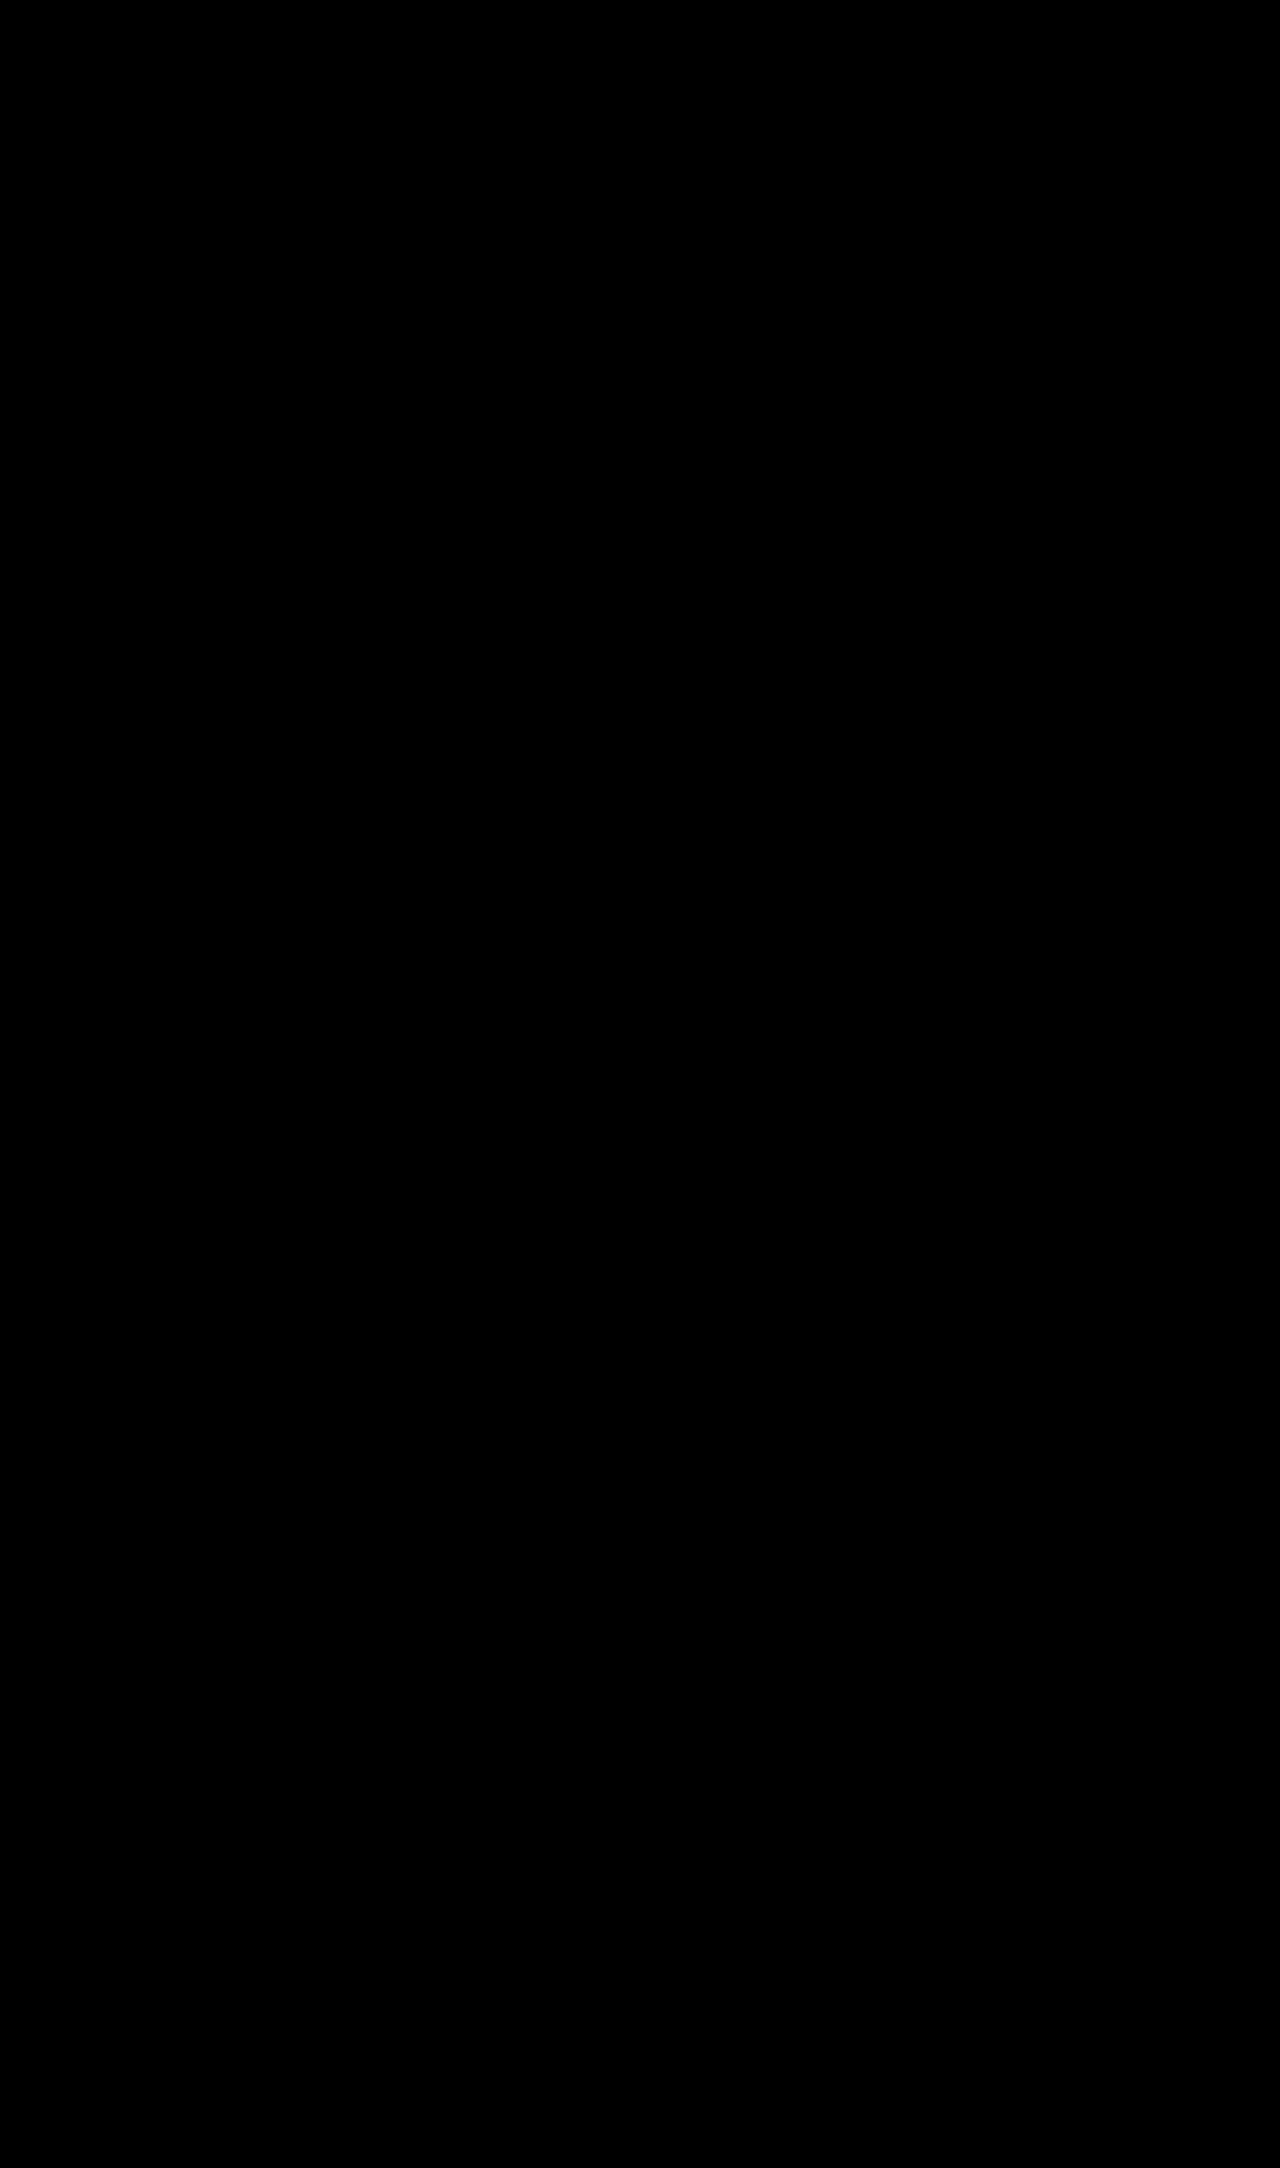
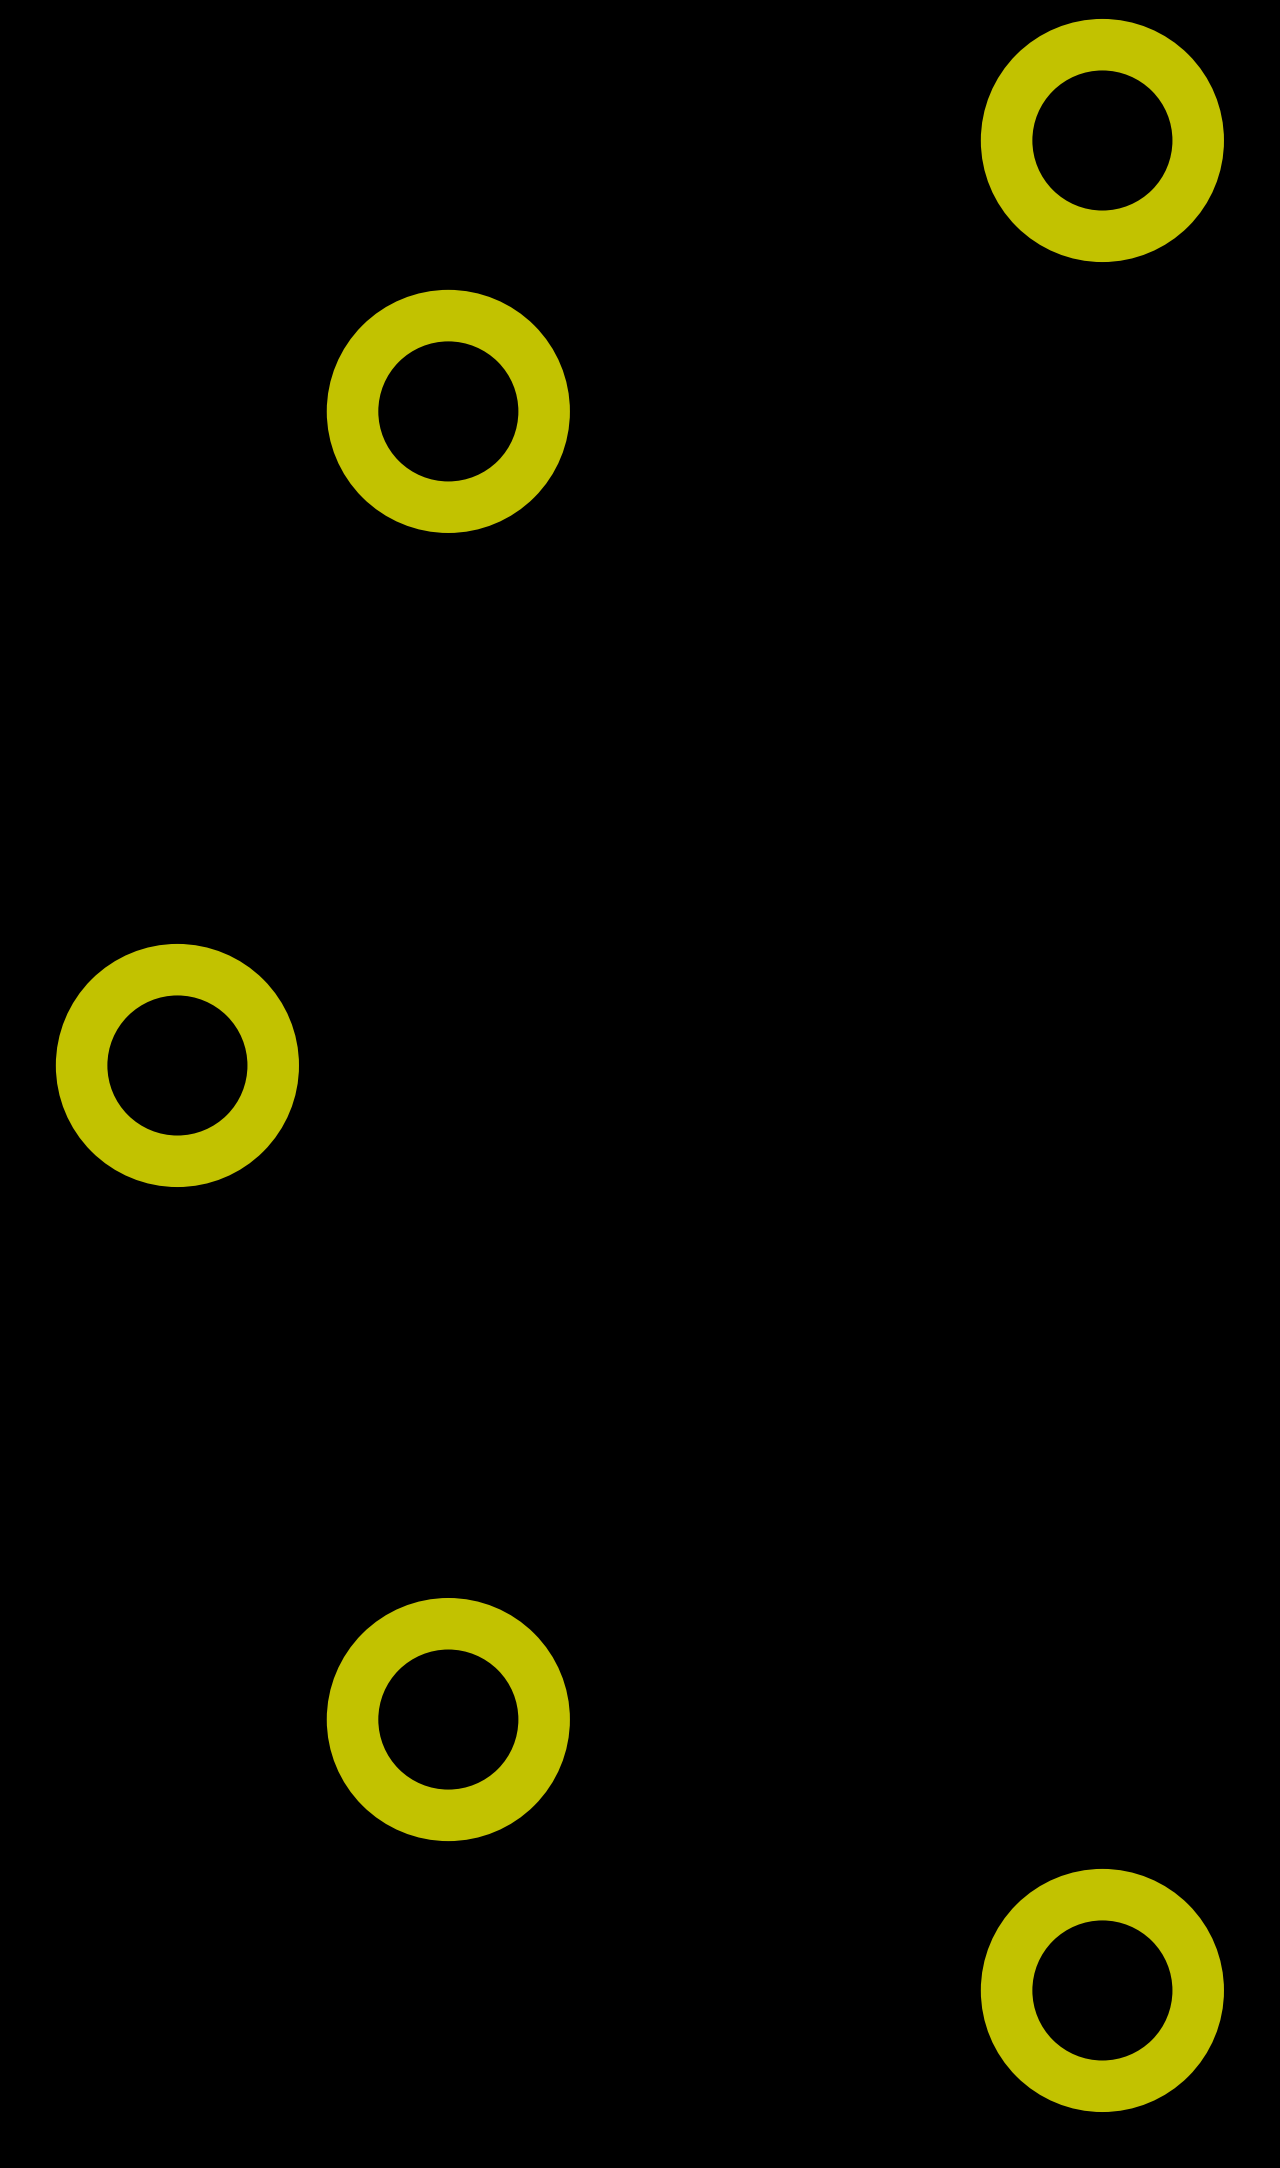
part: none -> (1102, 140)
part: none -> (448, 411)
part: none -> (177, 1065)
part: none -> (448, 1719)
part: none -> (1102, 1990)

